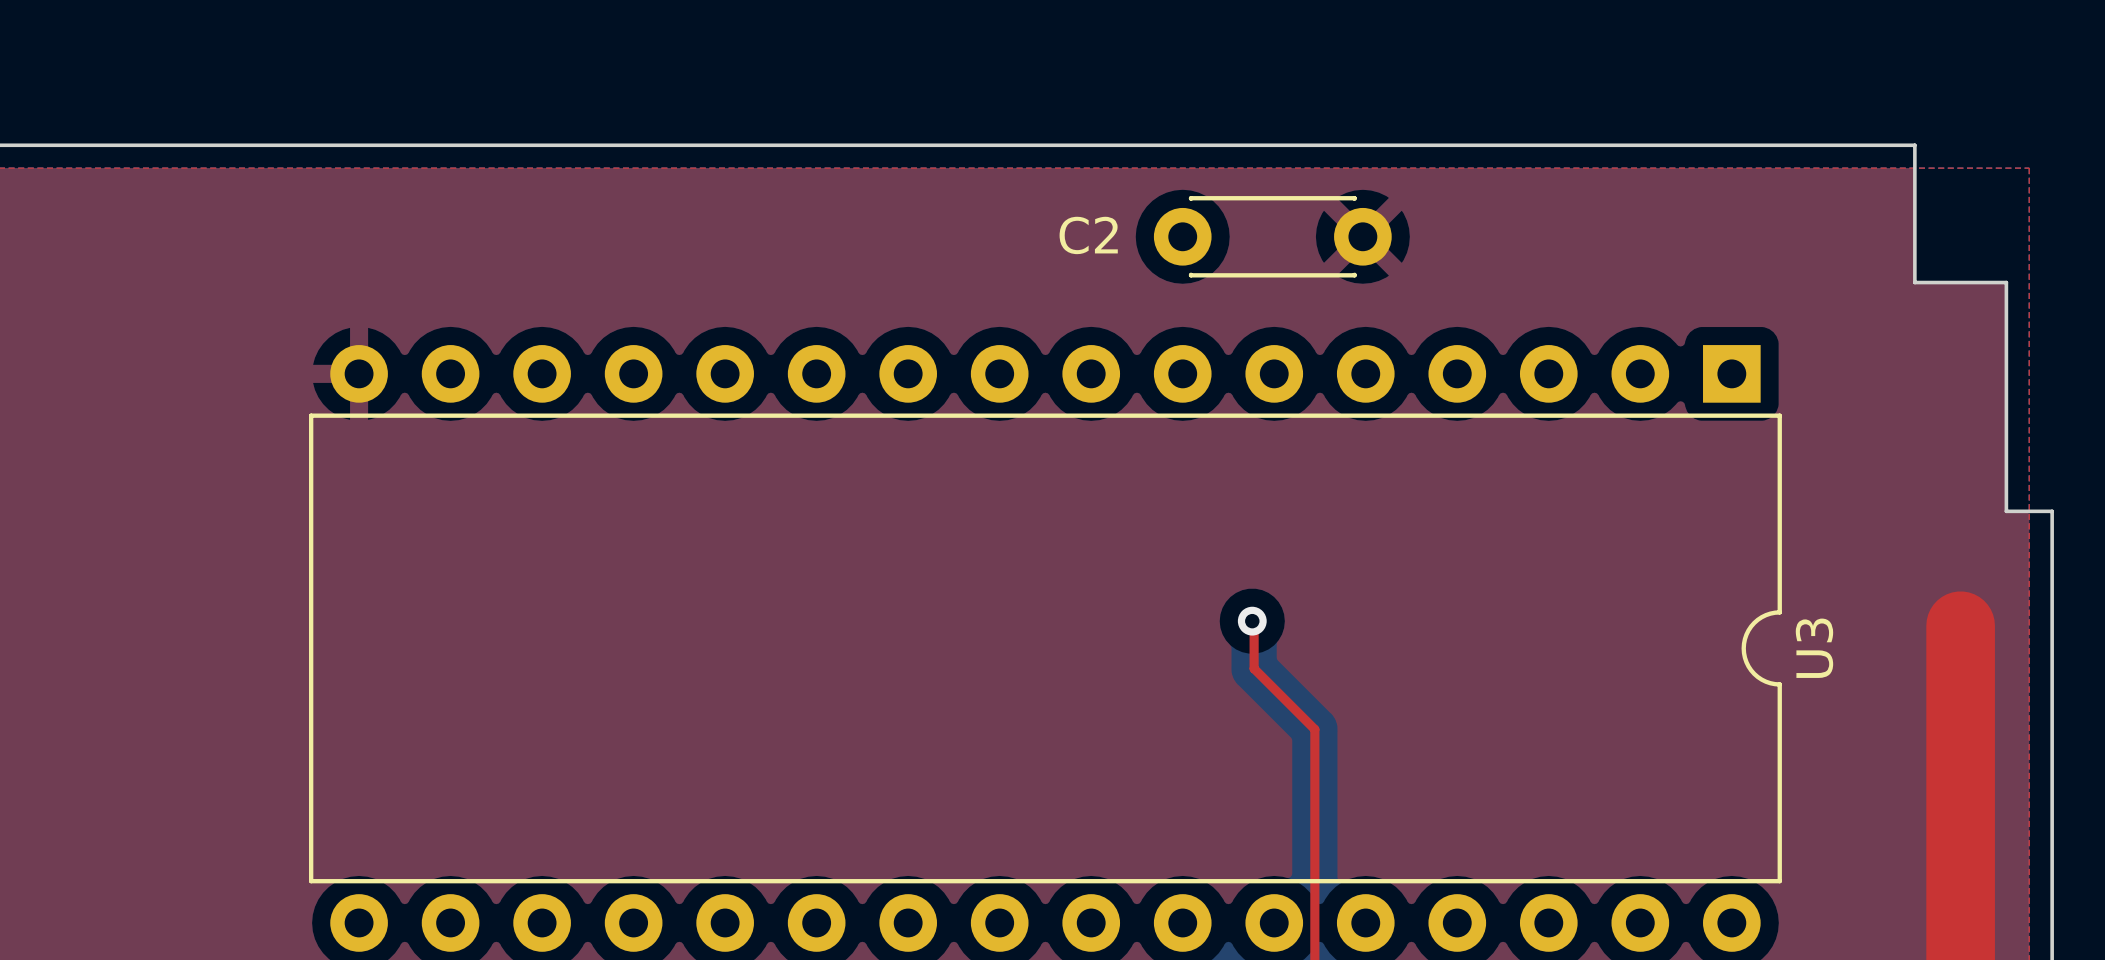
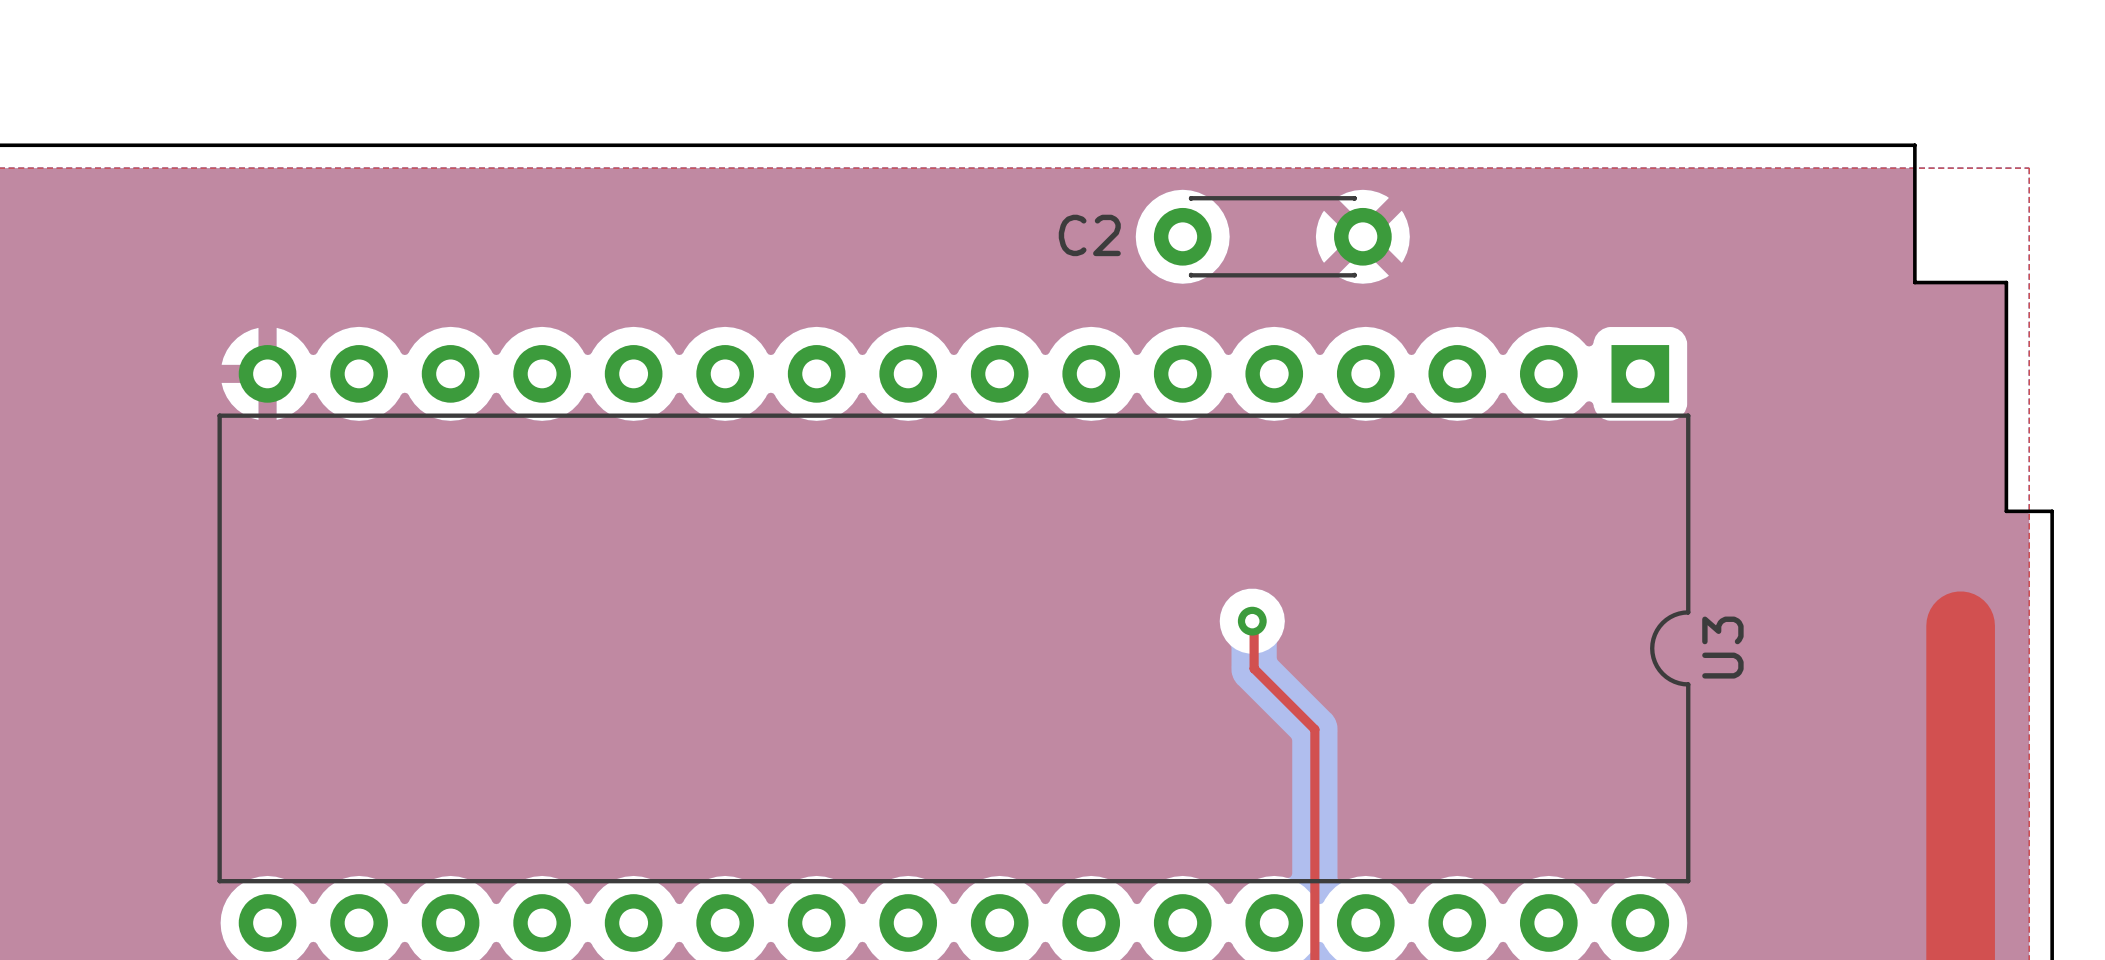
U3 position: (1045, 648) -> (953, 648)

